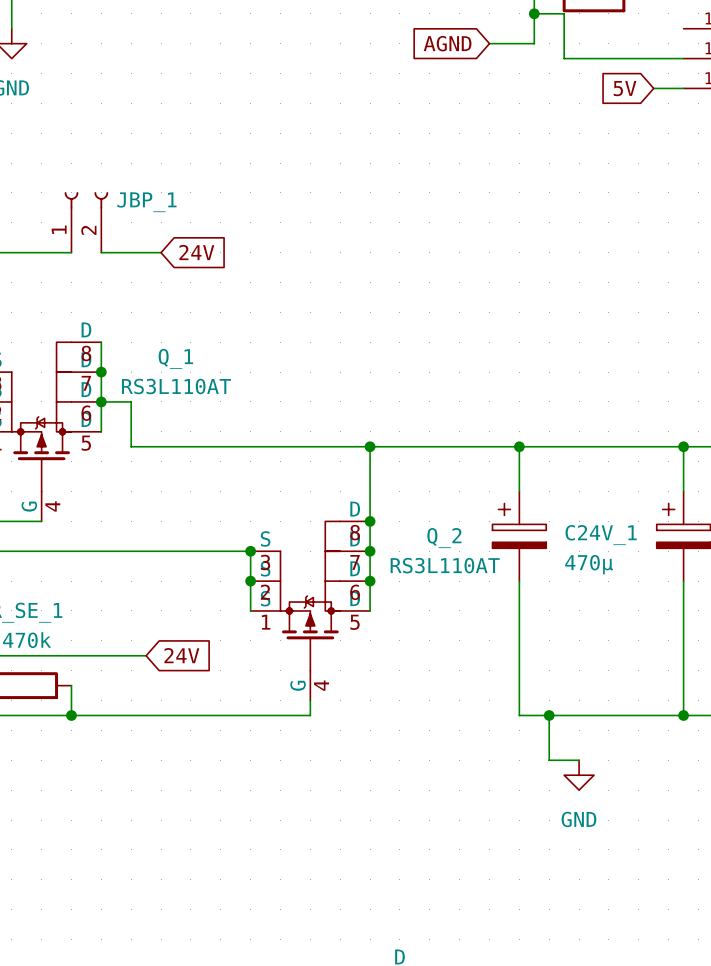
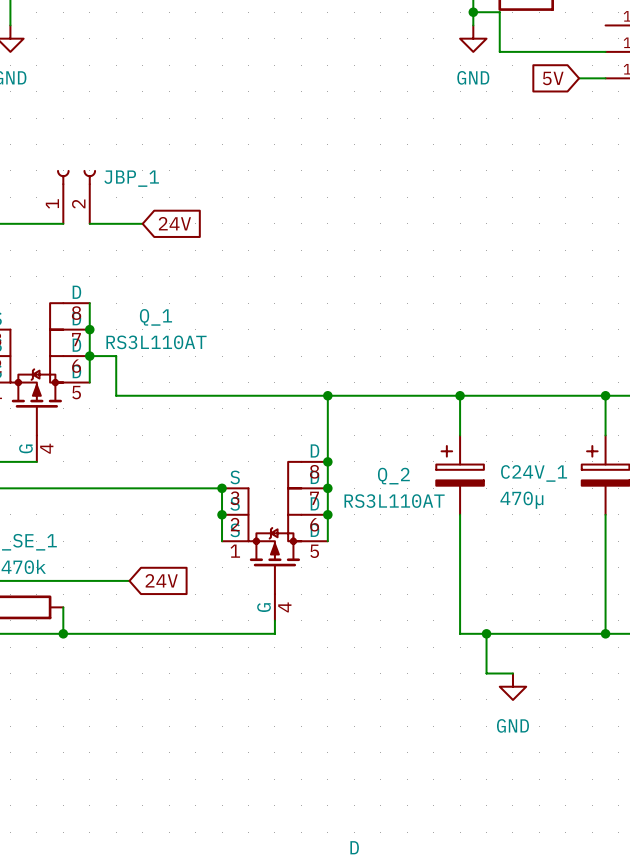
wire: (534, 28) (534, 43) (489, 43) -> none
global label: AGND (447, 43) -> none
power symbol: none -> GND (473, 38)

